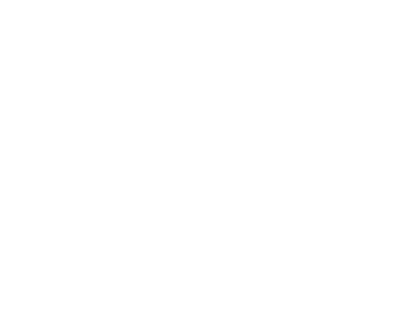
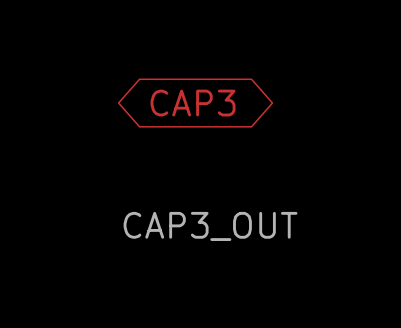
global label: none -> CAP3 (193, 103)
label: none -> CAP3_OUT (210, 226)

